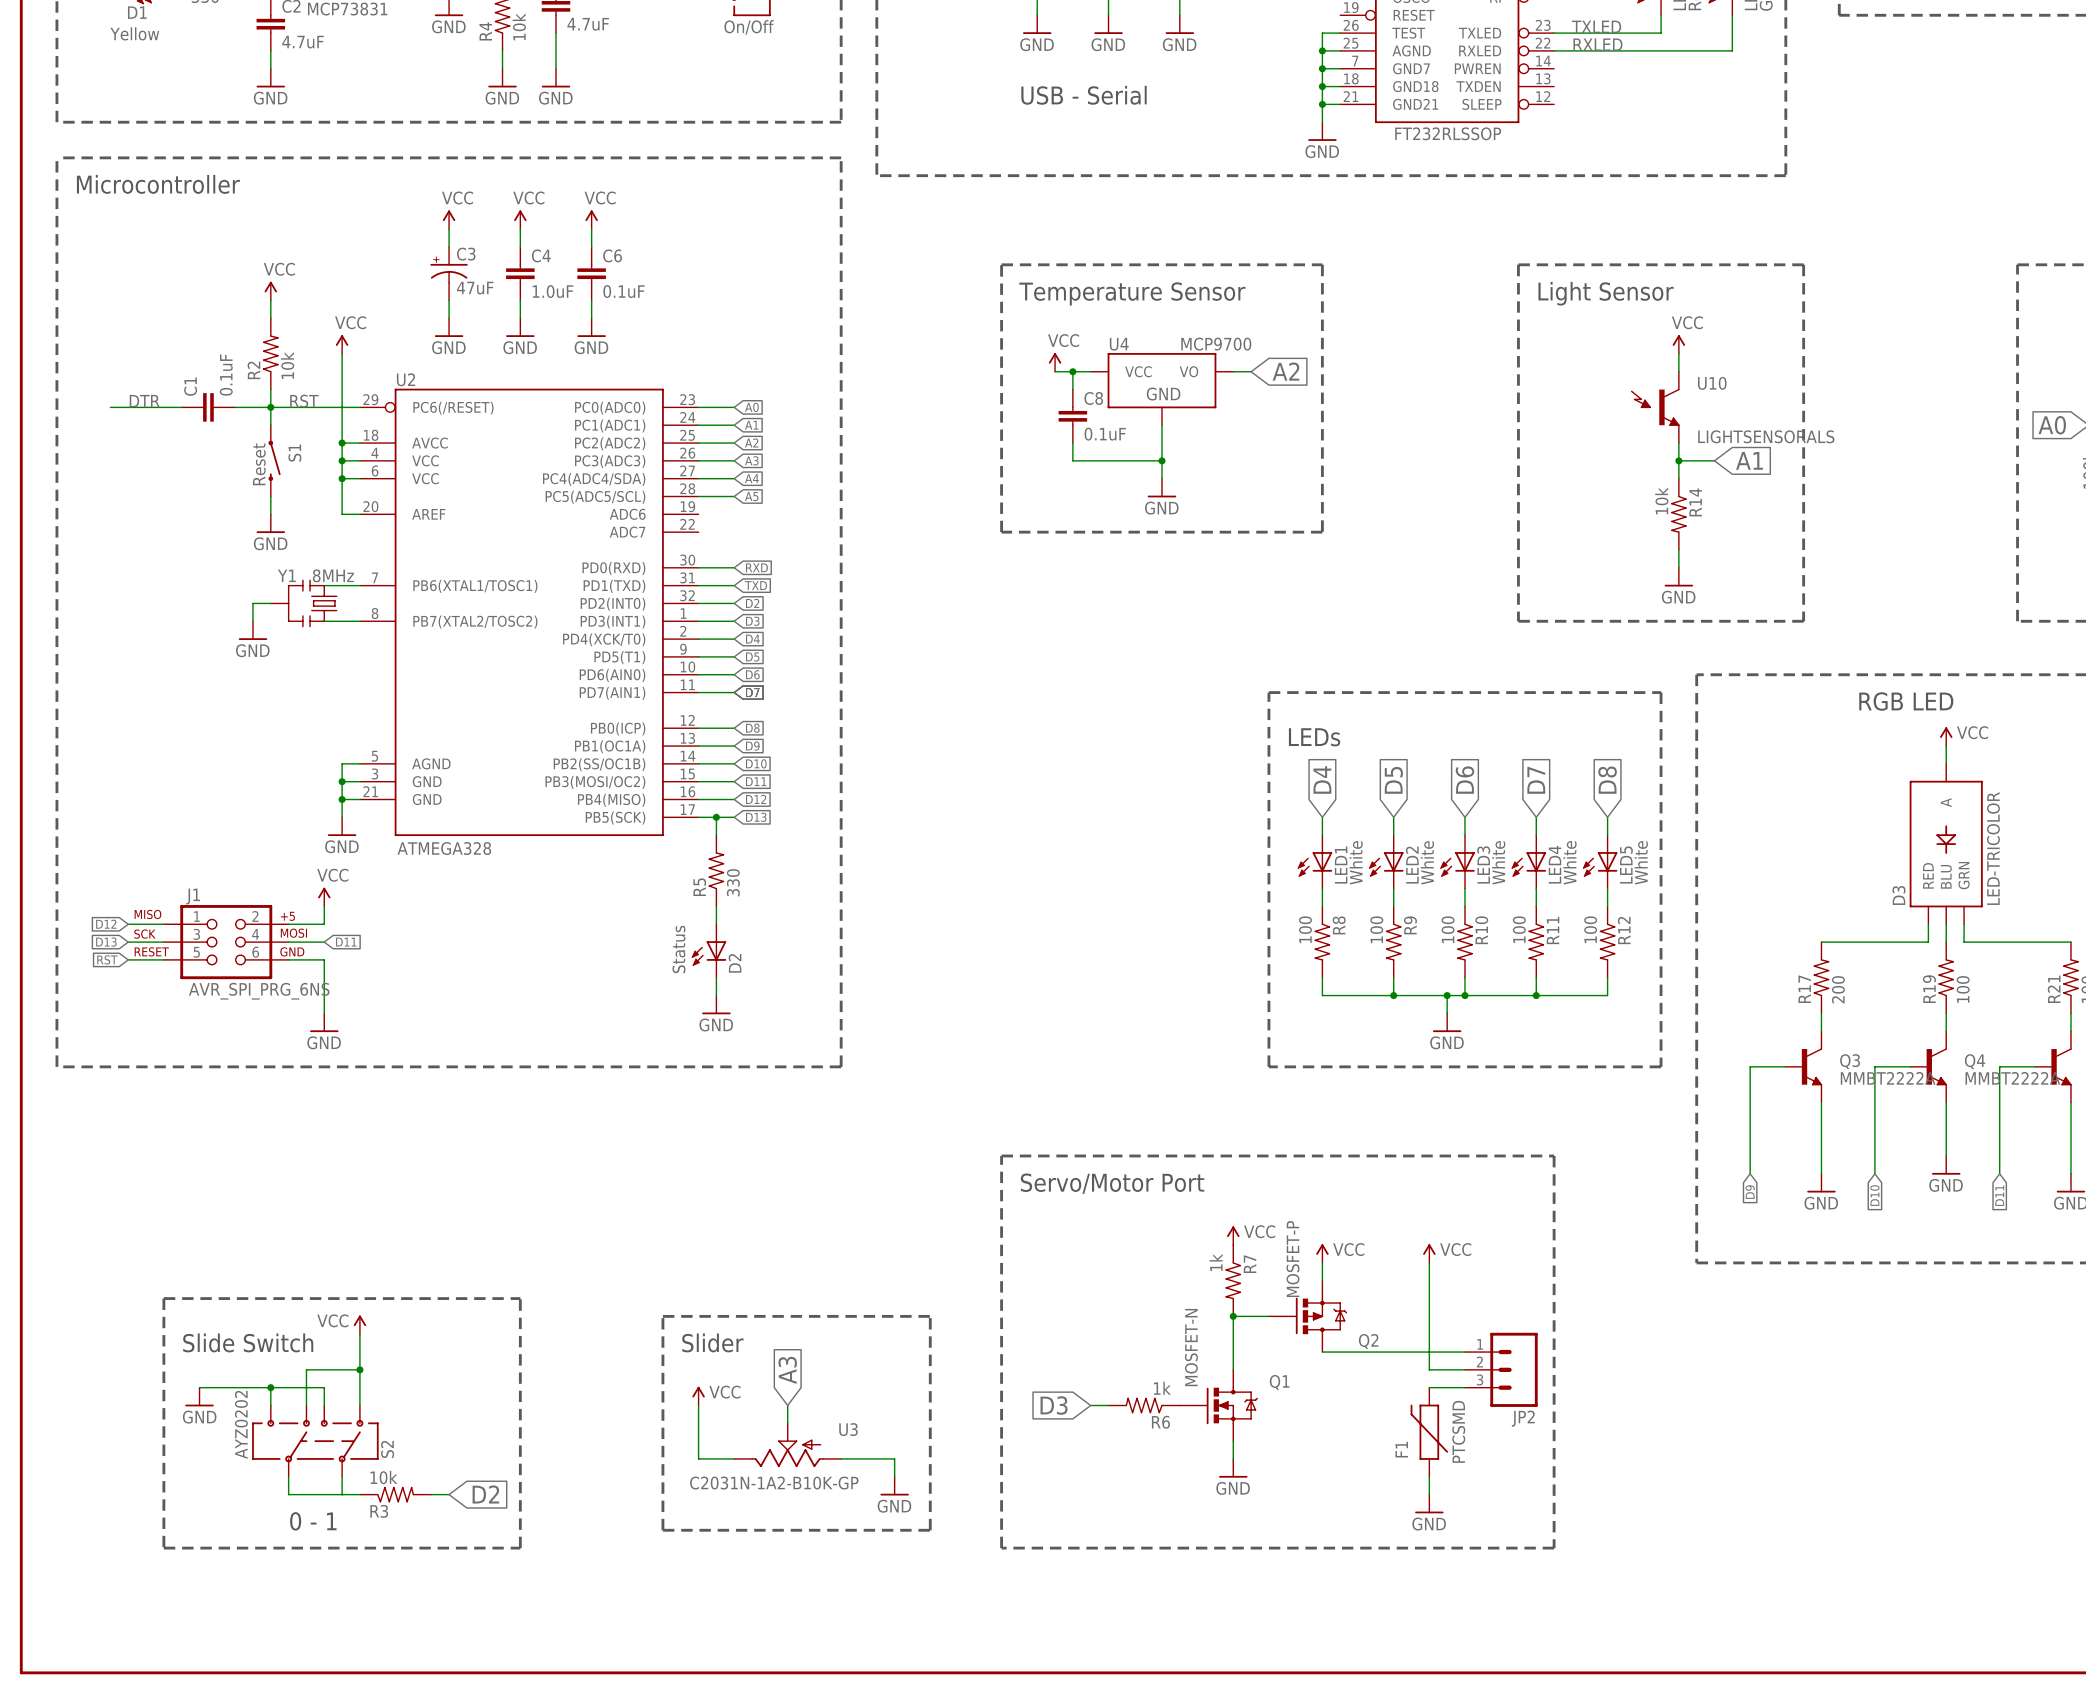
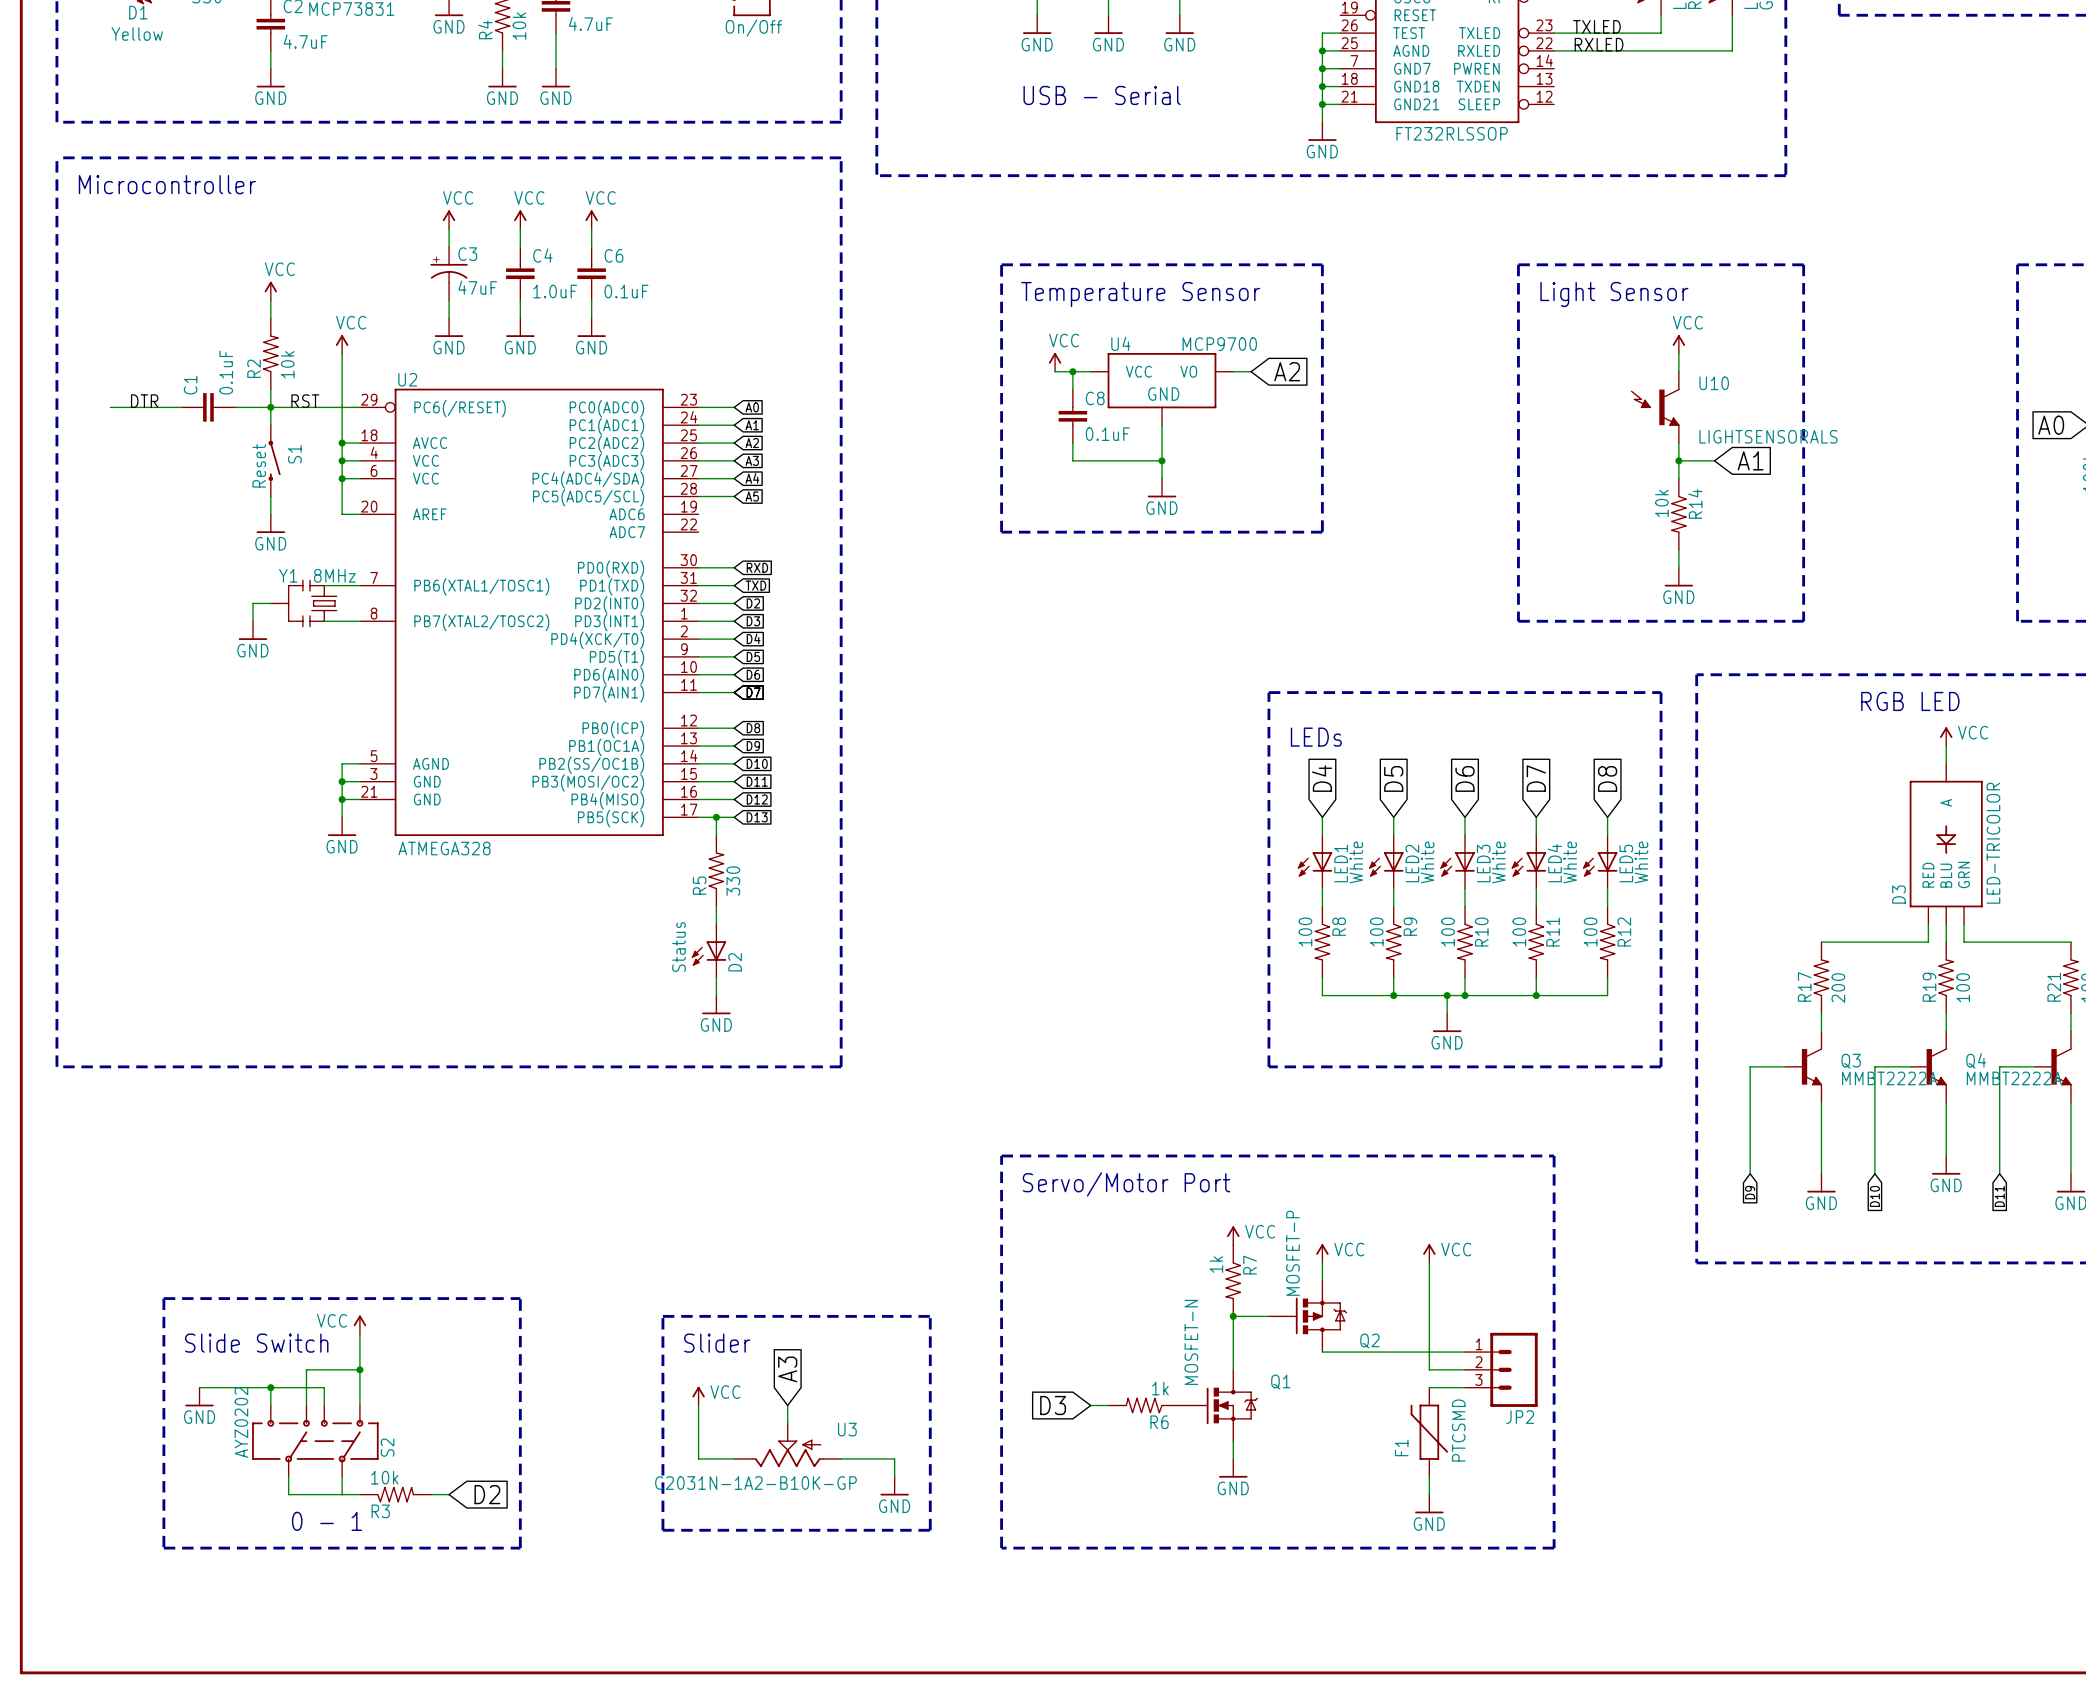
power symbol: VCC (324, 897) -> none
wire: (324, 906) (324, 924) (288, 924) -> none
global label: D12 (106, 924) -> none
wire: (128, 924) (163, 924) -> none
global label: D13 (106, 942) -> none
wire: (128, 942) (163, 942) -> none
J1: AVR_SPI_PRG_6NS (226, 942) -> none
wire: (288, 942) (324, 942) -> none
global label: D11 (346, 942) -> none
global label: RST (107, 959) -> none
wire: (128, 959) (163, 959) -> none
wire: (288, 959) (324, 959) (324, 1013) -> none
power symbol: GND (324, 1022) -> none

